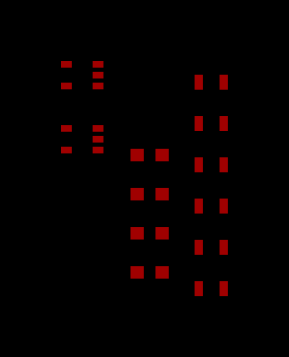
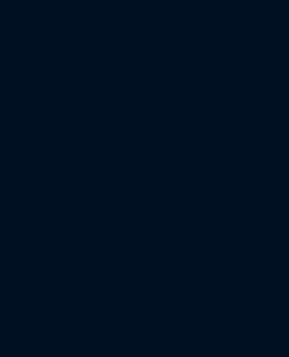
part: (82, 75) -> none
part: (211, 82) -> none
part: (211, 123) -> none
part: (82, 139) -> none
part: (149, 155) -> none
part: (211, 164) -> none
part: (149, 194) -> none
part: (211, 206) -> none
part: (149, 233) -> none
part: (211, 247) -> none
part: (149, 272) -> none
part: (211, 288) -> none

